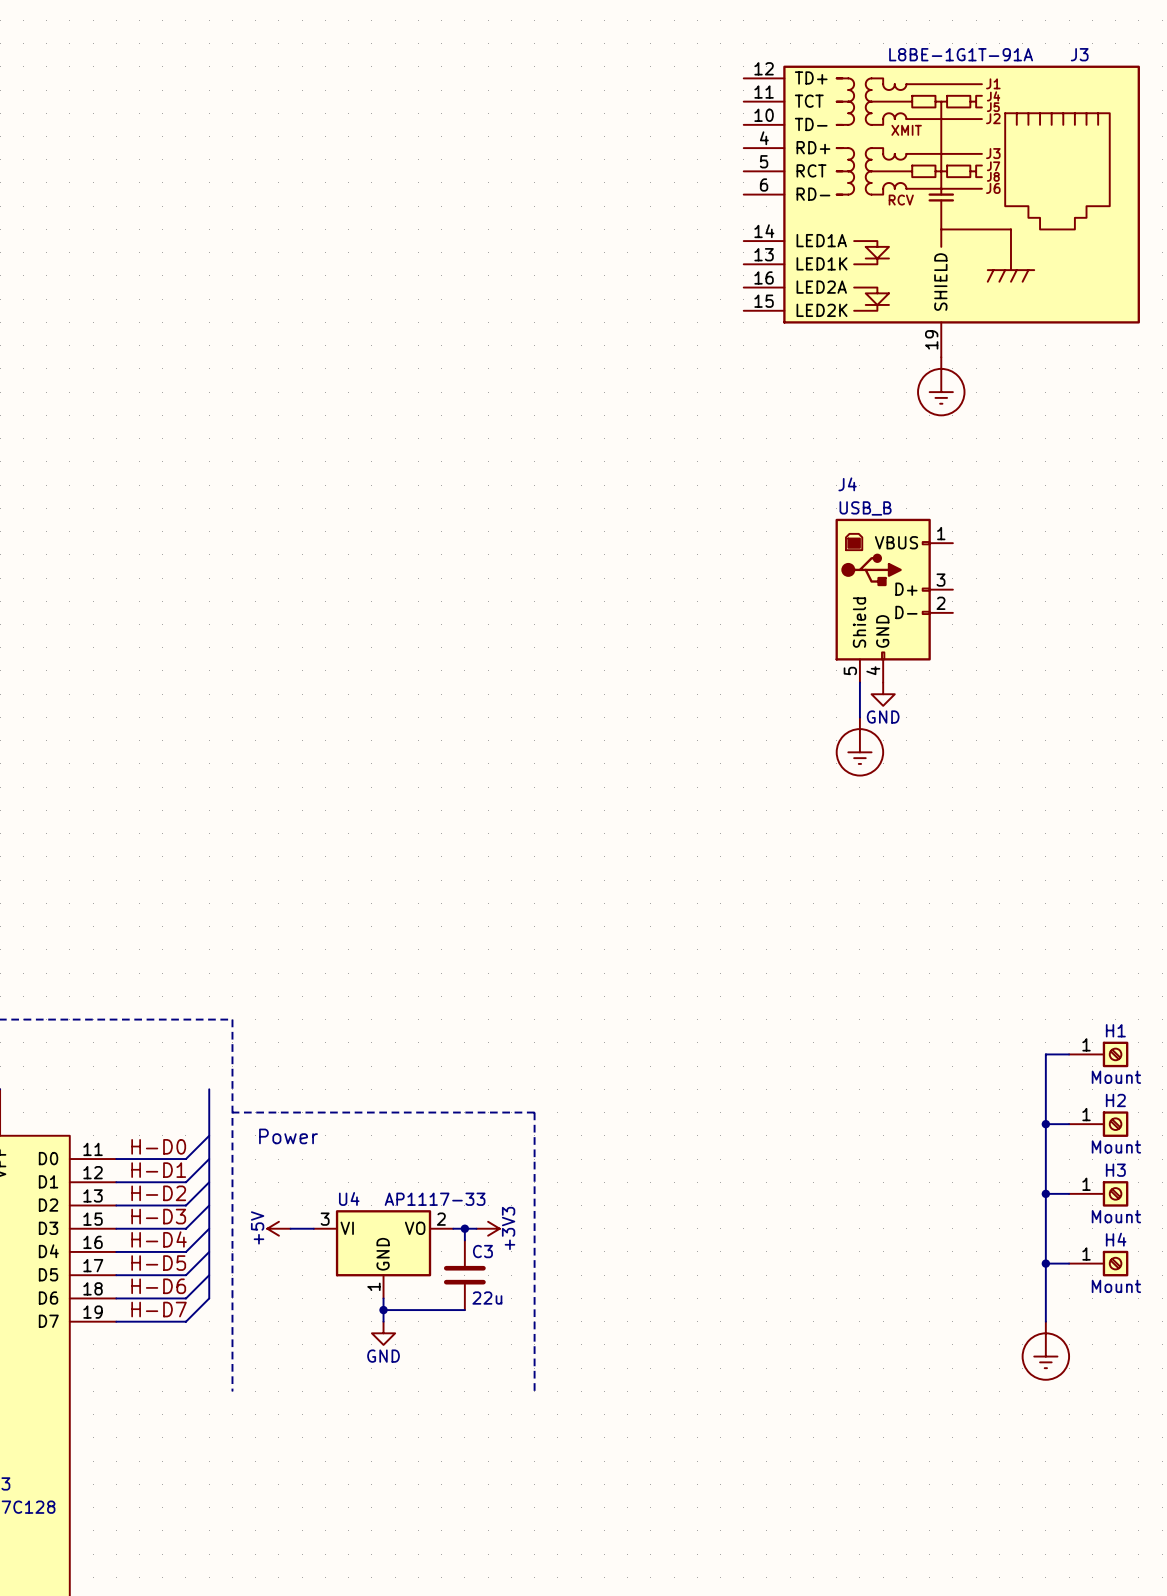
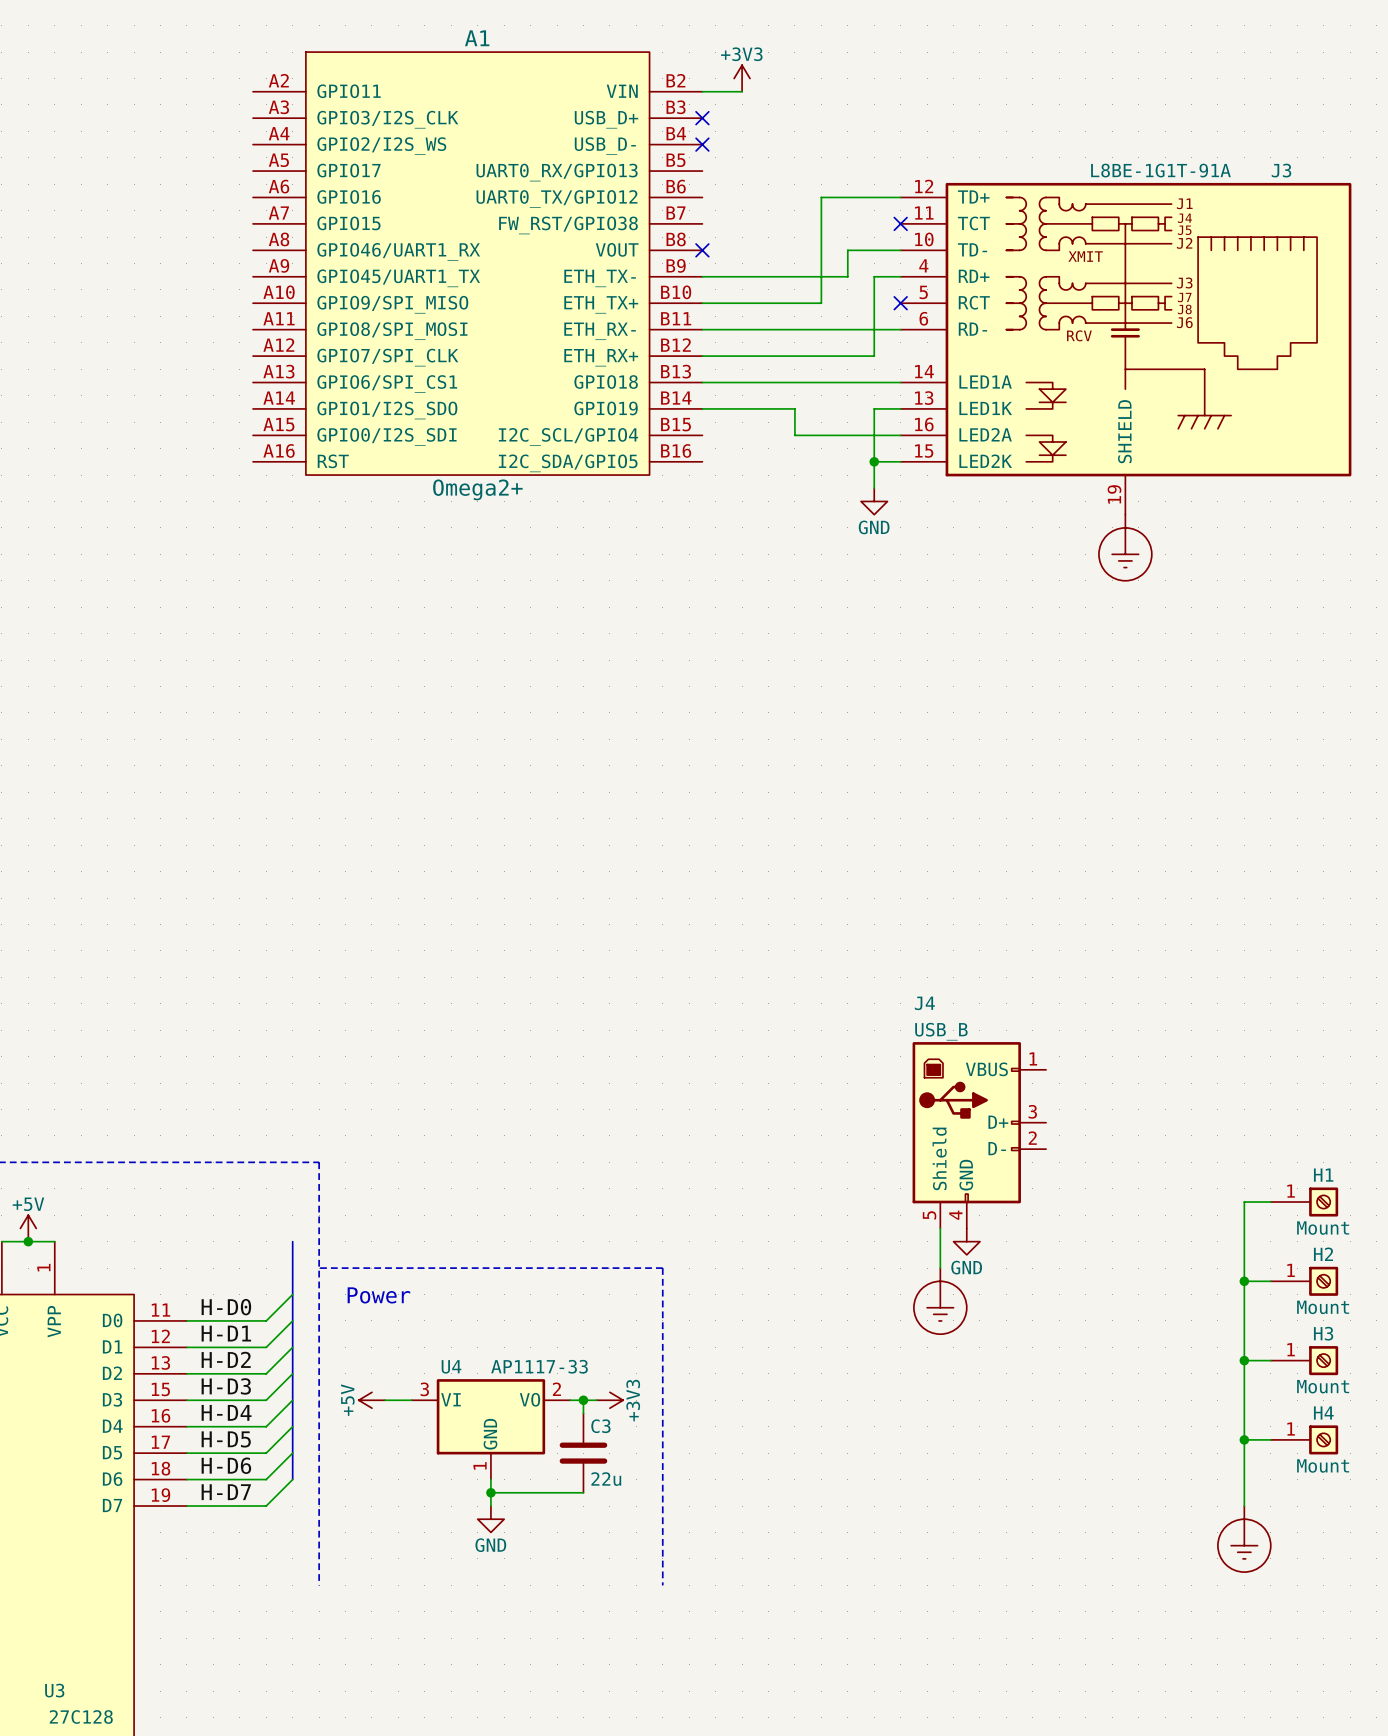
power symbol: none -> +3V3 (742, 78)
wire: none -> (702, 91) (742, 91)
no-connect mark: none -> (702, 118)
no-connect mark: none -> (702, 144)
wire: none -> (900, 197) (821, 197) (821, 303) (702, 303)
no-connect mark: none -> (900, 223)
J3 position: (941, 211) -> (1126, 348)
no-connect mark: none -> (702, 250)
wire: none -> (900, 250) (847, 250) (847, 276) (702, 276)
A1: none -> Omega2+ (477, 263)
wire: none -> (900, 276) (874, 276) (874, 356) (702, 356)
no-connect mark: none -> (900, 303)
wire: none -> (702, 329) (900, 329)
wire: none -> (702, 382) (900, 382)
wire: none -> (702, 408) (794, 408) (794, 435) (900, 435)
wire: none -> (900, 408) (874, 408) (874, 488)
power symbol position: (941, 386) -> (1125, 547)
wire: none -> (874, 461) (900, 461)
junction: none -> (874, 461)
power symbol: none -> GND (874, 501)
J4 position: (894, 600) -> (979, 1135)
wire: (859, 682) (859, 717) -> none
power symbol: GND (883, 694) -> none
power symbol: (859, 746) -> none
wire: none -> (940, 1228) (940, 1268)
power symbol: none -> GND (966, 1241)
power symbol: none -> (940, 1301)

